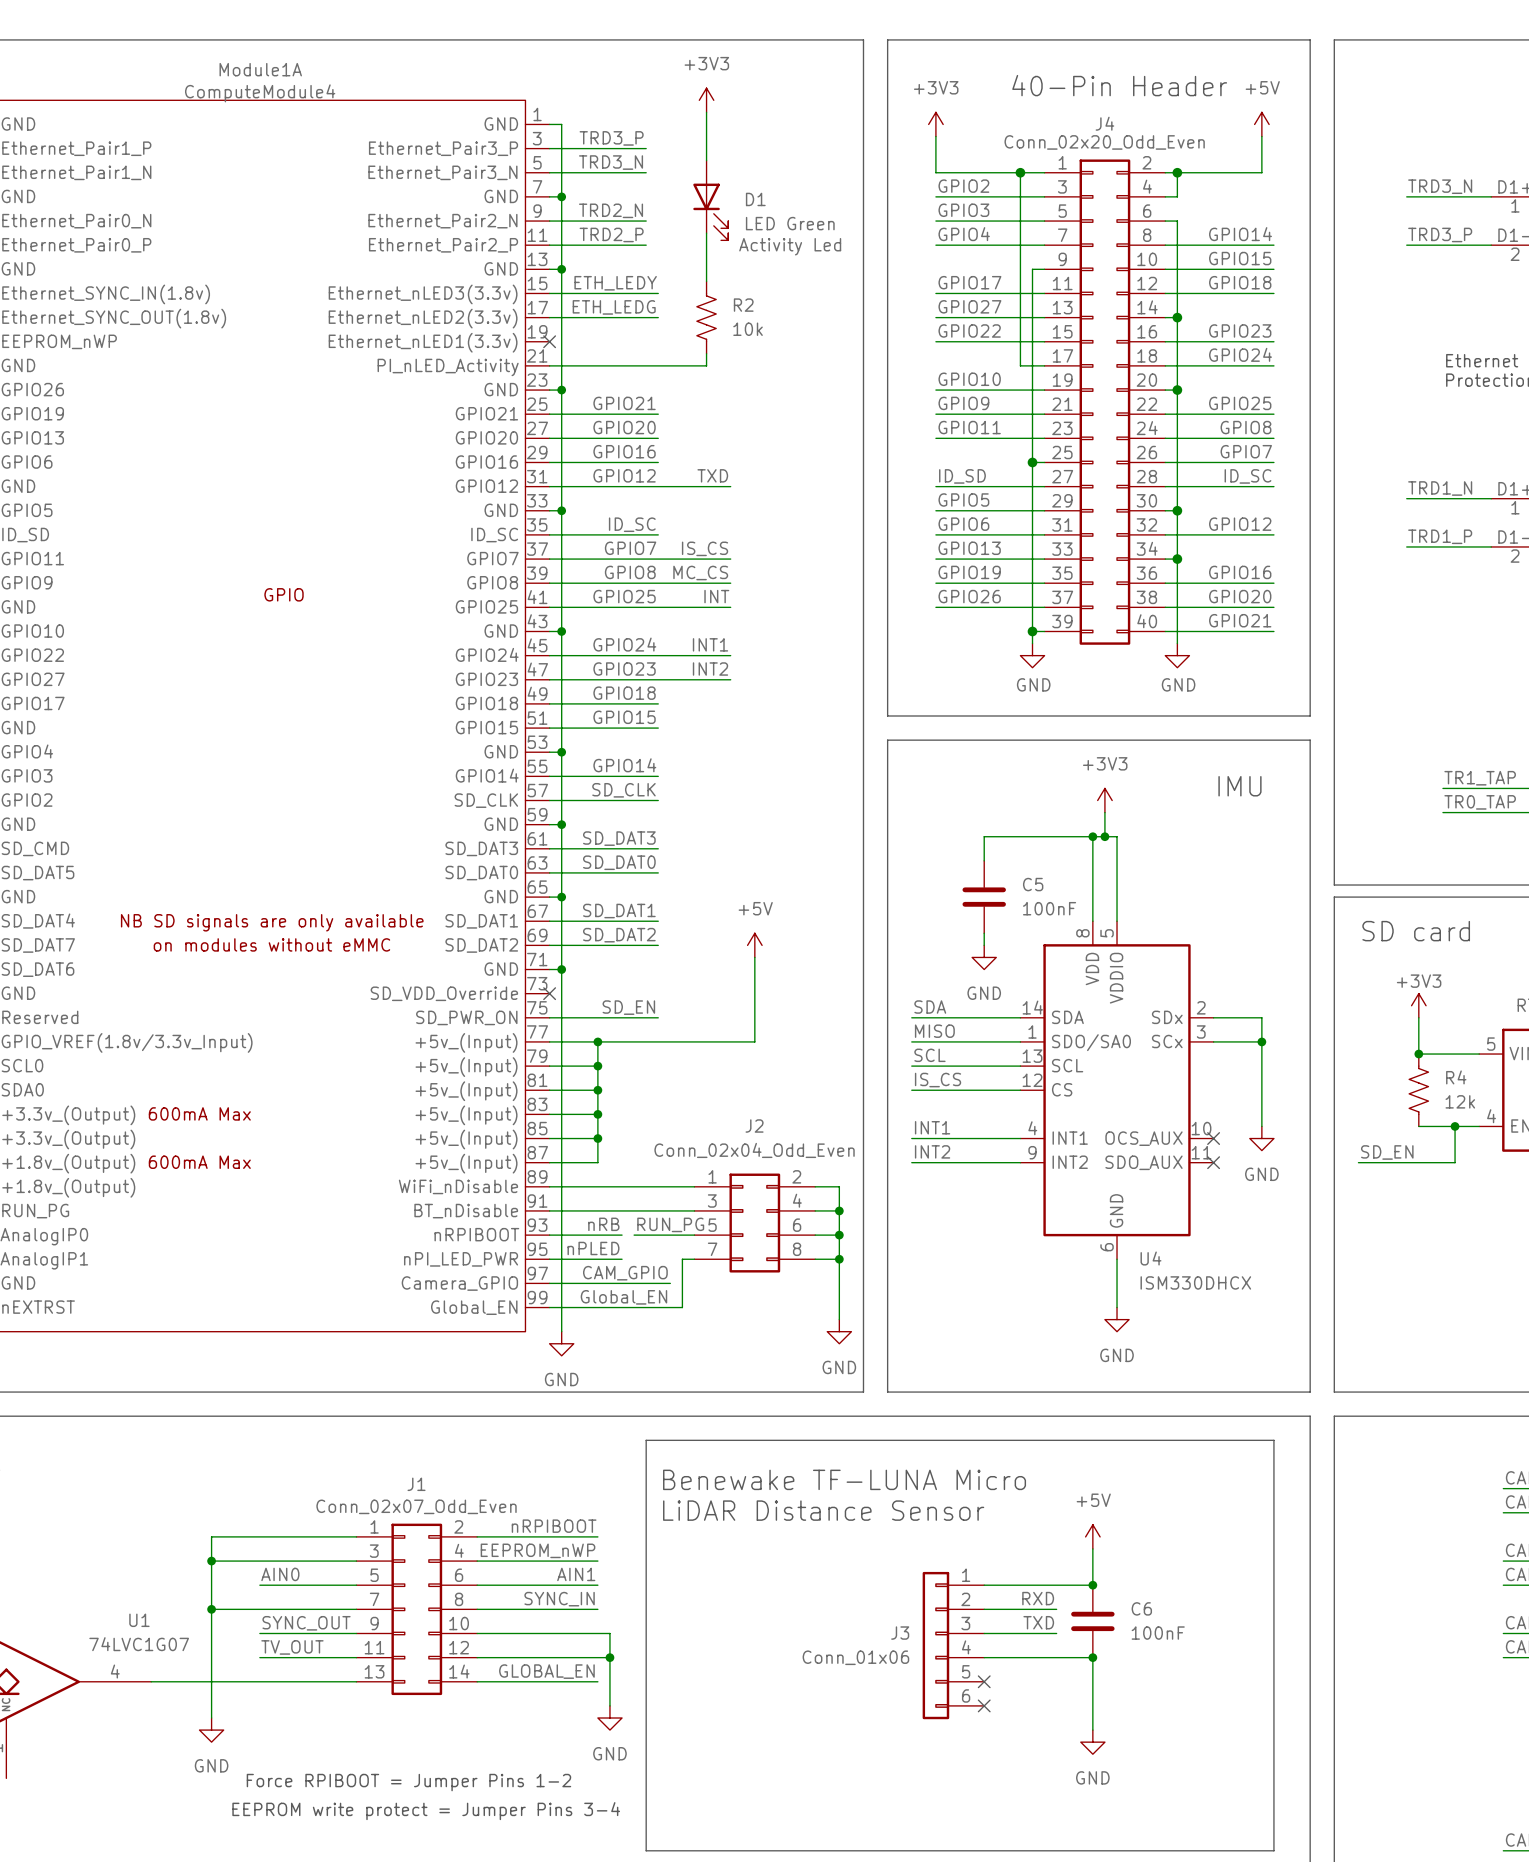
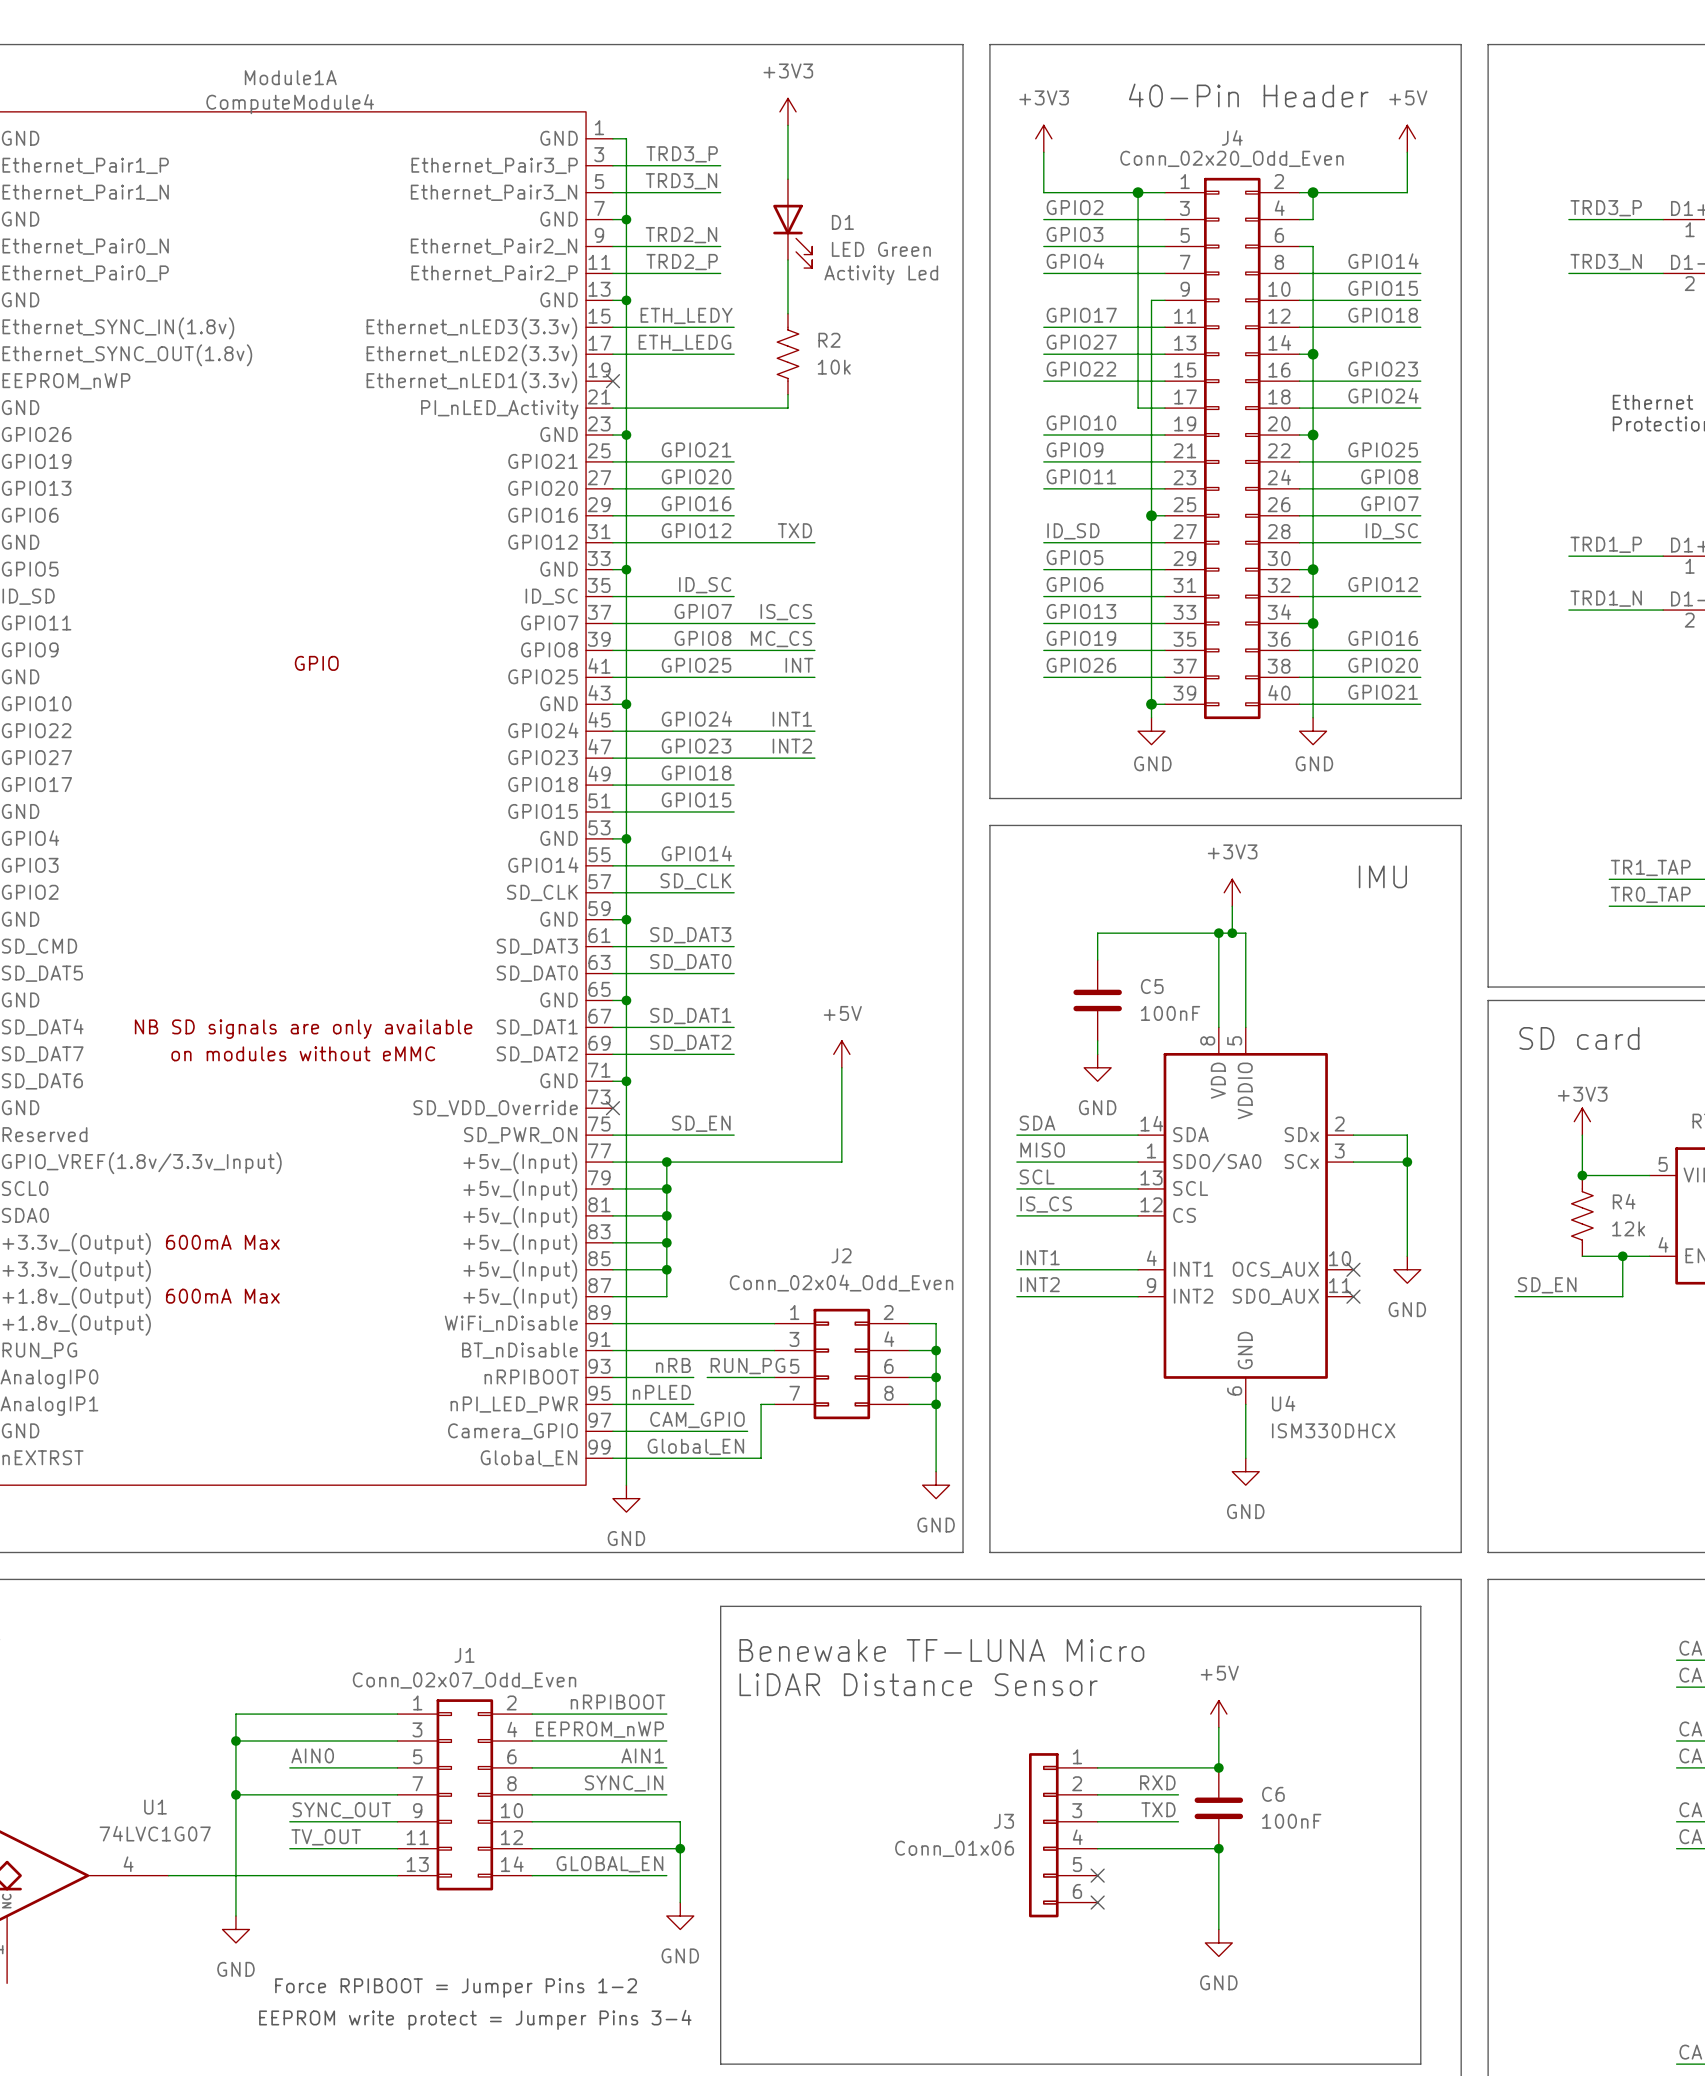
label: TRD3_N (1440, 186) -> TRD3_P (1606, 208)
label: TRD3_P (1440, 234) -> TRD3_N (1606, 262)
label: TRD1_N (1440, 488) -> TRD1_P (1606, 544)
label: TRD1_P (1440, 536) -> TRD1_N (1606, 598)

